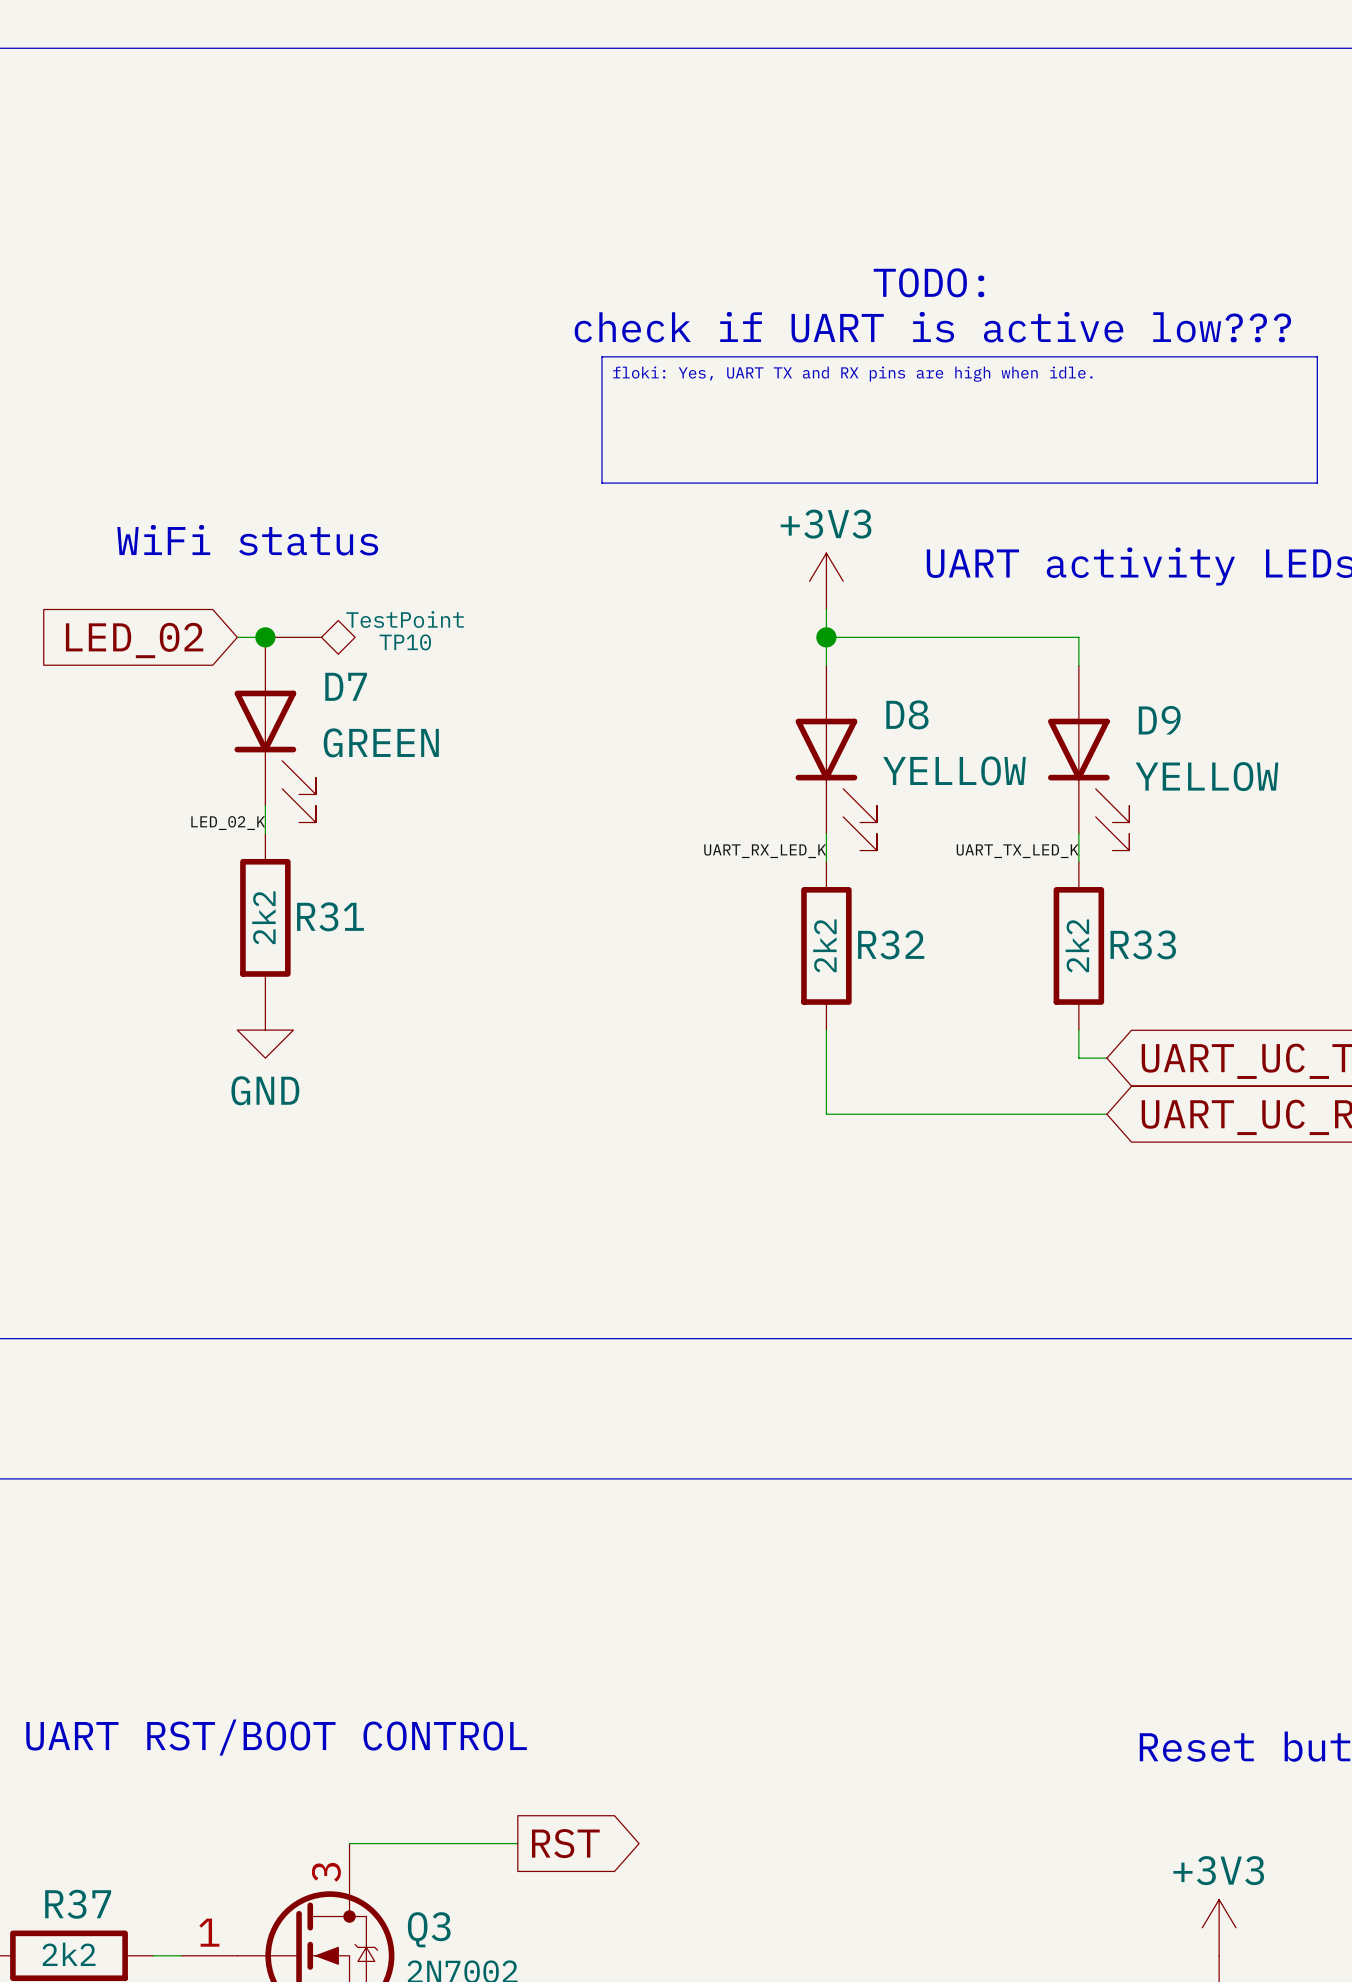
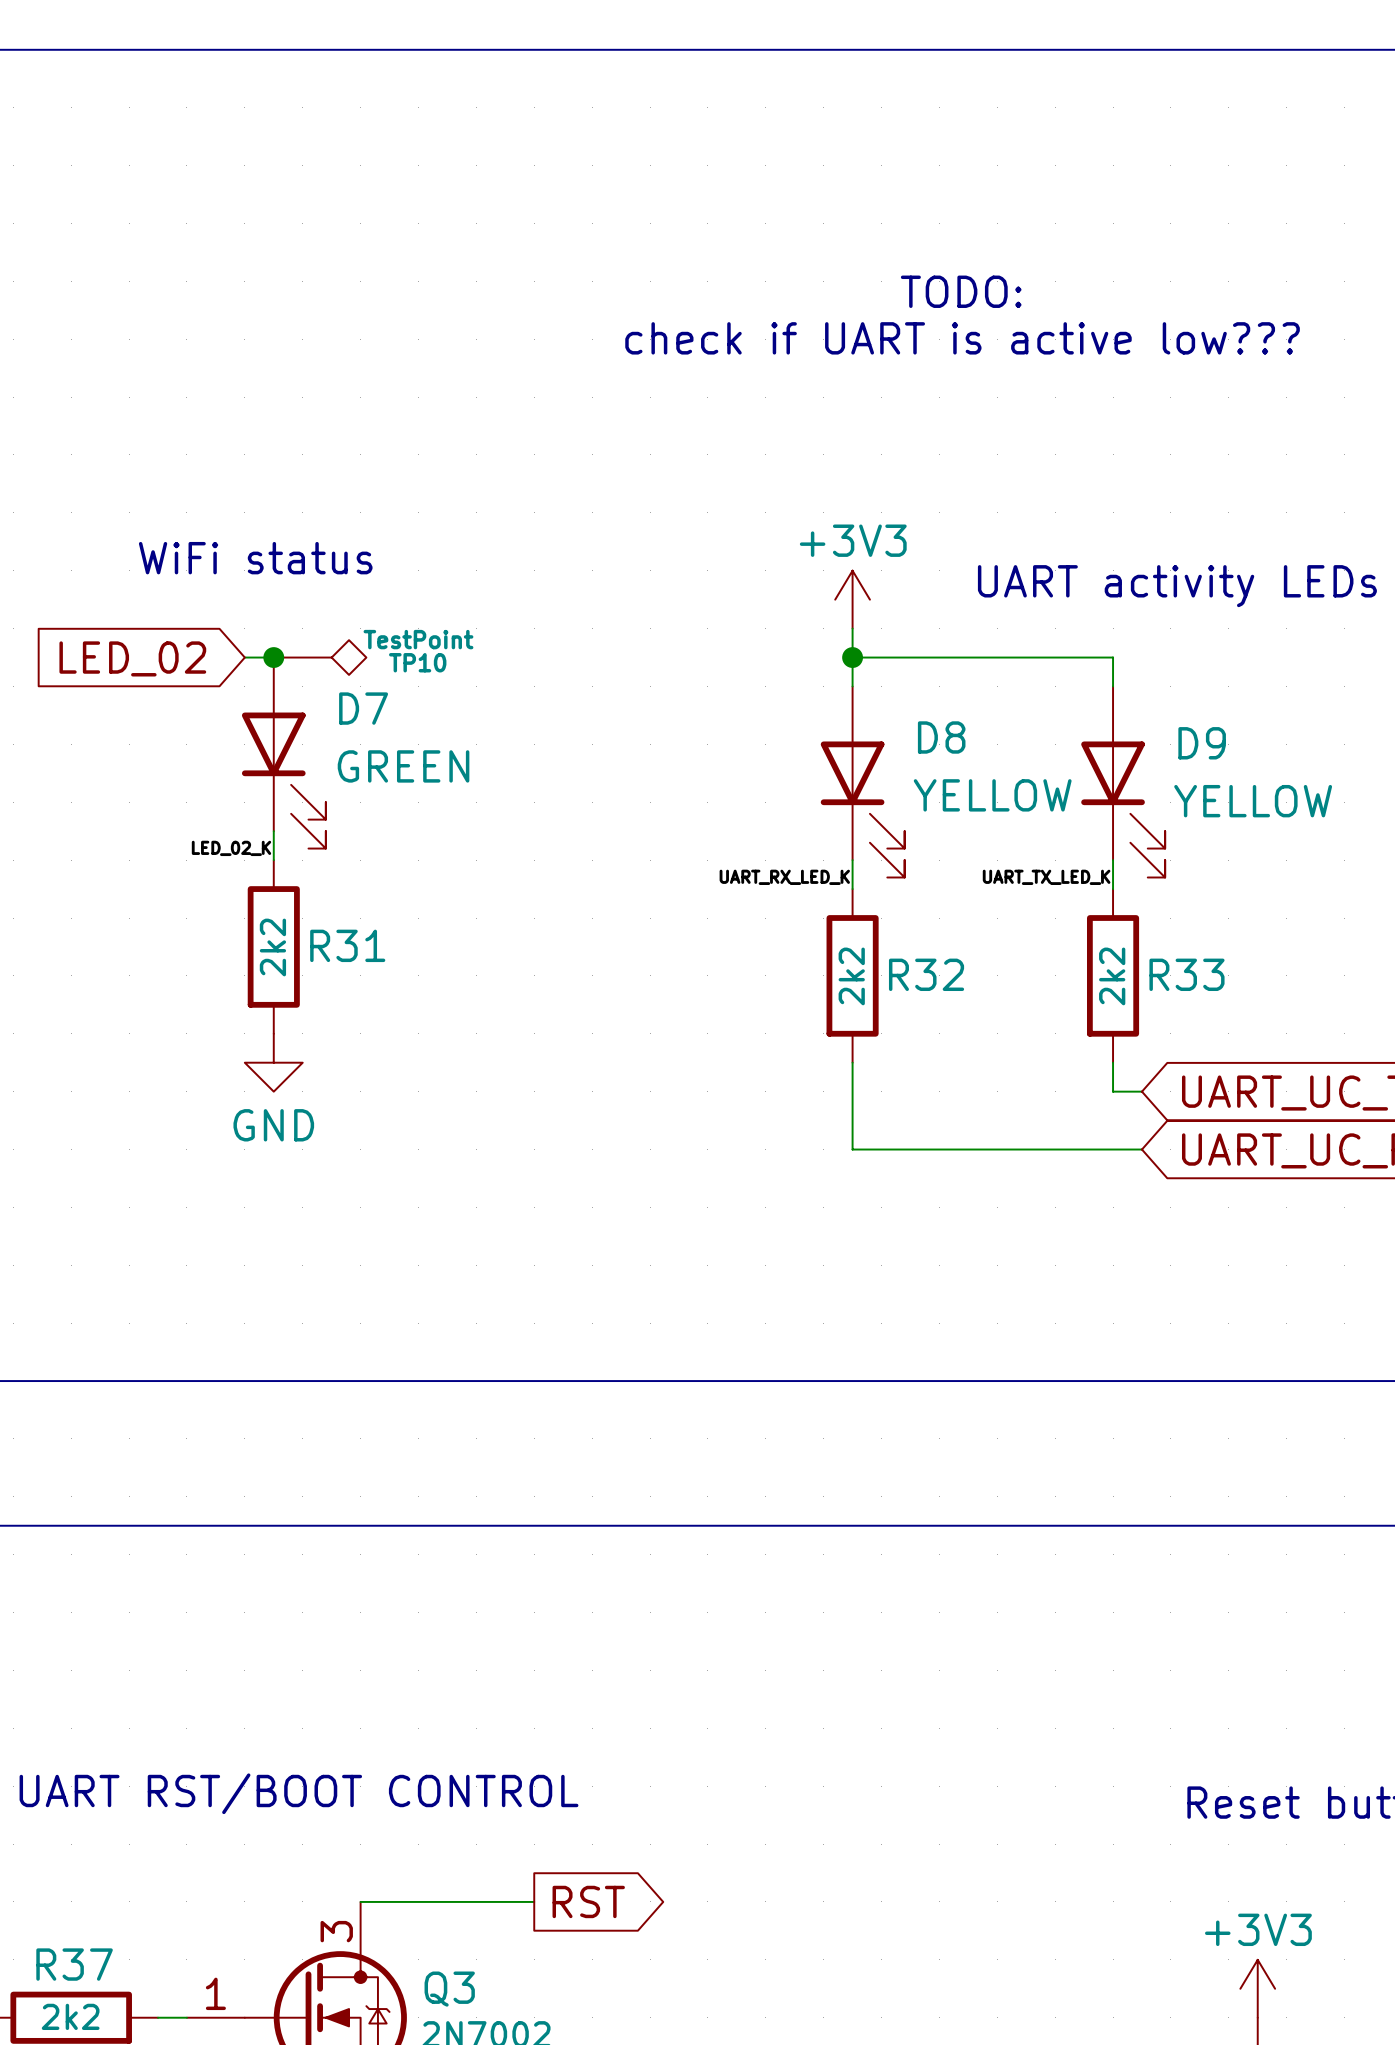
line: (601, 356) (1317, 356) (1317, 483) (601, 483) (601, 356) -> none
text: floki: Yes, UART TX and RX pins are high when idle. (852, 374) -> none

